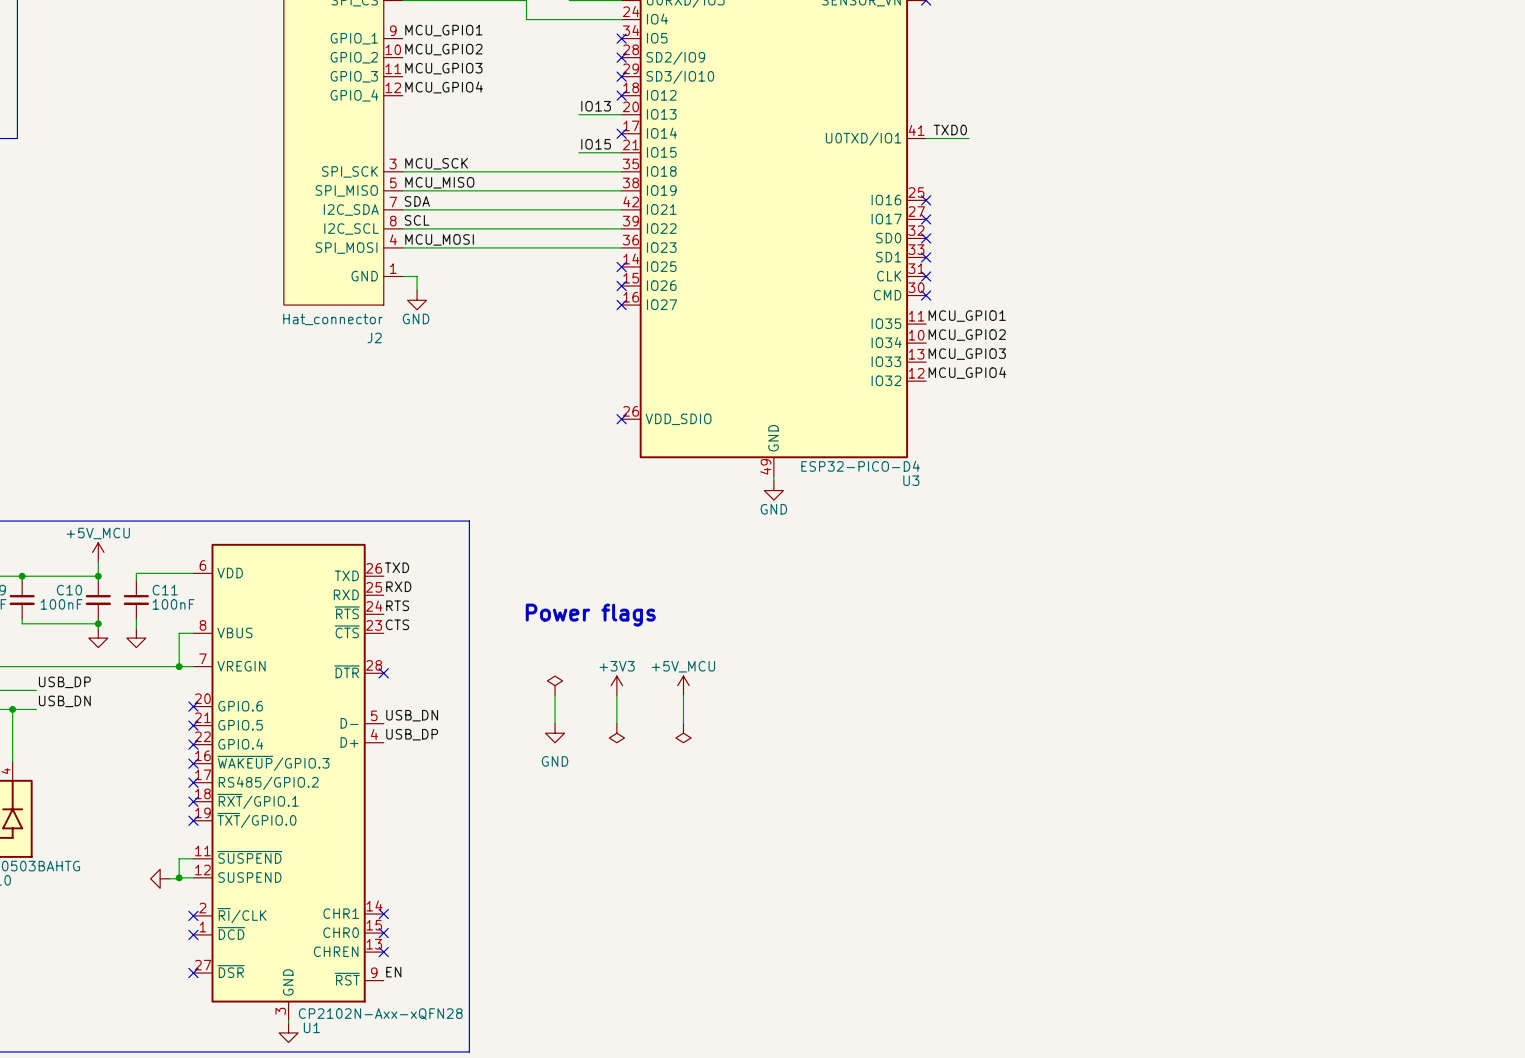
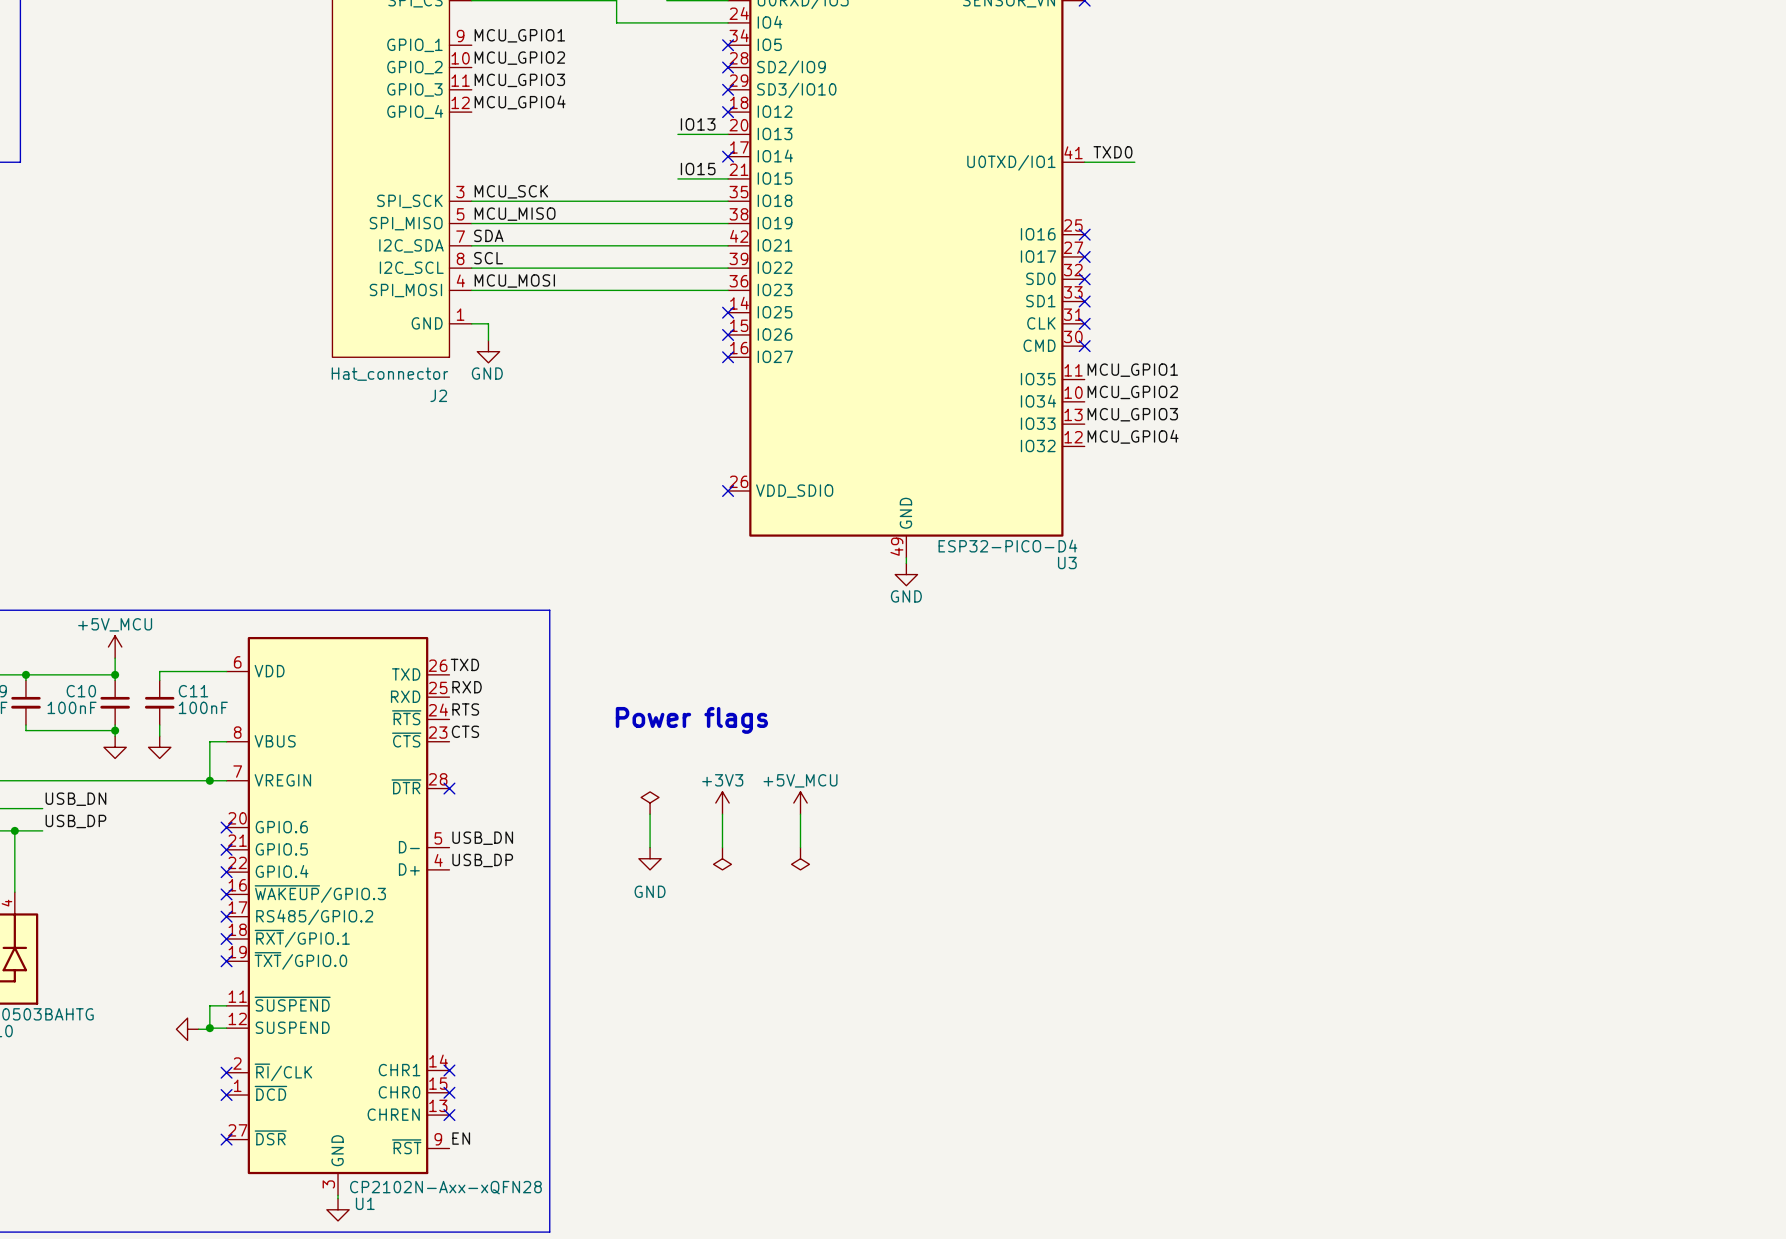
label: USB_DP (64, 682) -> USB_DN (75, 799)
label: USB_DN (64, 701) -> USB_DP (75, 821)

